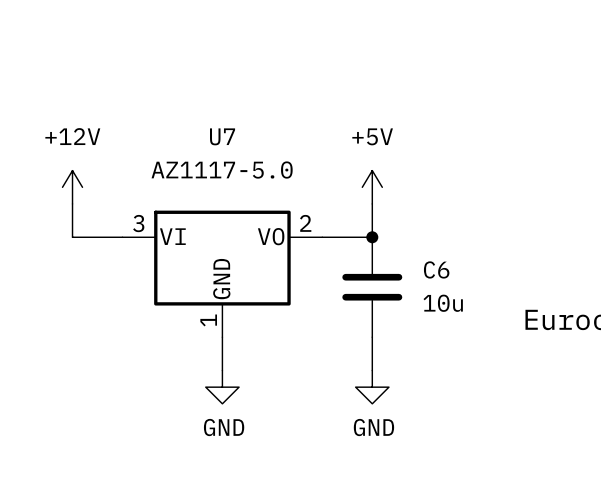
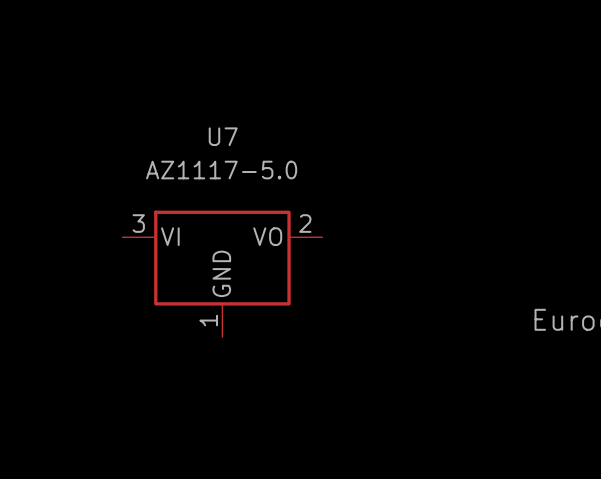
power symbol: +12V (72, 187) -> none
power symbol: +5V (372, 187) -> none
wire: (72, 203) (72, 237) (122, 237) -> none
wire: (372, 203) (372, 237) (322, 237) -> none
junction: (372, 237) -> none
C6: 10u (372, 287) -> none
wire: (222, 337) (222, 370) -> none
wire: (372, 337) (372, 370) -> none
power symbol: GND (222, 387) -> none
power symbol: GND (372, 387) -> none

